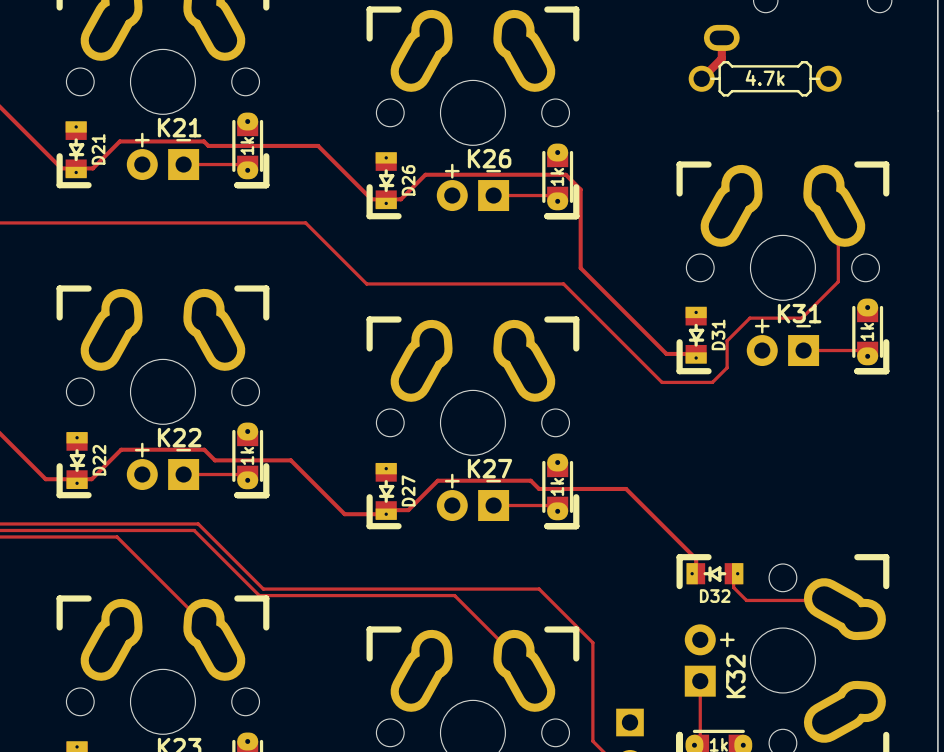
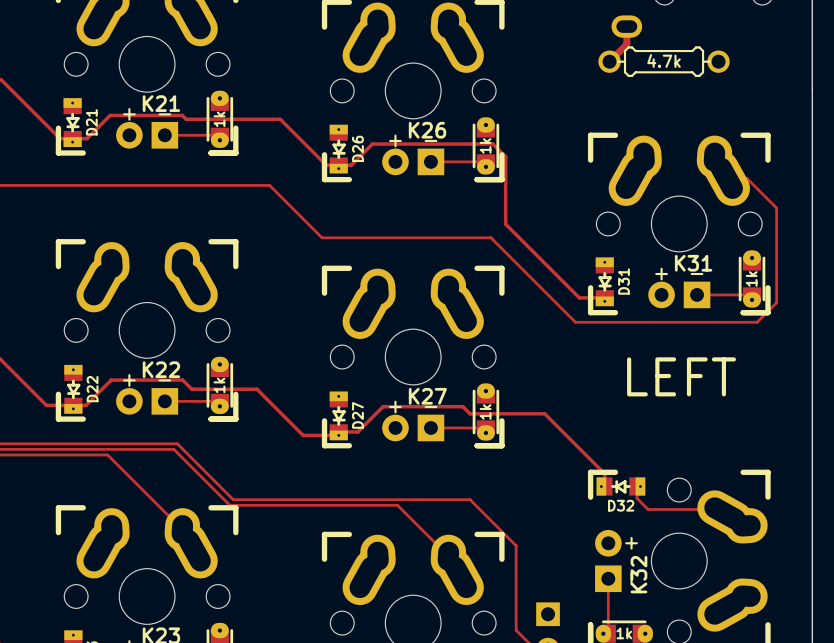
track: (838, 214) (838, 281) (801, 318) (749, 318) (727, 340) (727, 367) (712, 382) -> (726, 178) (746, 178) (776, 208) (776, 302) (757, 322) (618, 322)
text: none -> LEFT (681, 376)

